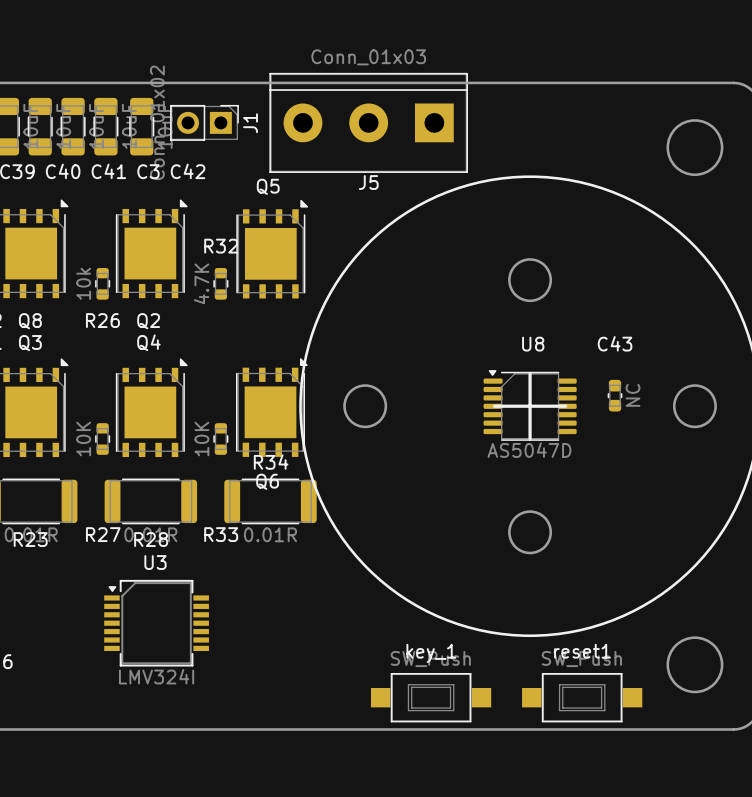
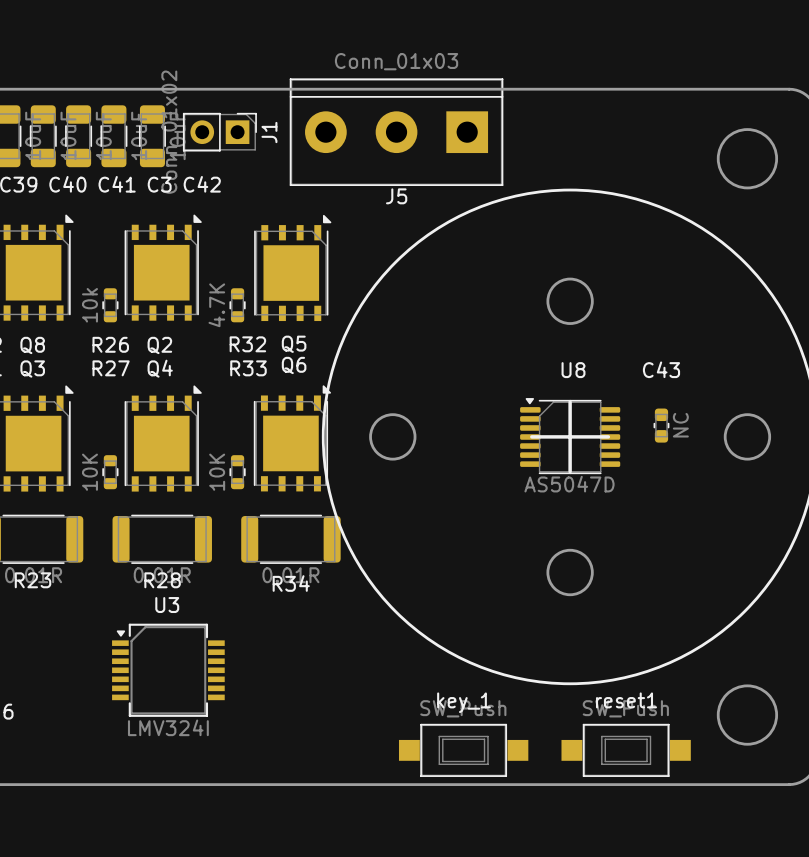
Q5 name position: Q5 (268, 186) -> Q5 (294, 344)
R32 name position: R32 (221, 246) -> R32 (247, 344)
R34 name position: R34 (271, 462) -> R34 (291, 583)
Q6 name position: Q6 (267, 481) -> Q6 (294, 365)
R27 name position: R27 (103, 534) -> R27 (111, 368)
R33 name position: R33 (221, 534) -> R33 (248, 368)

